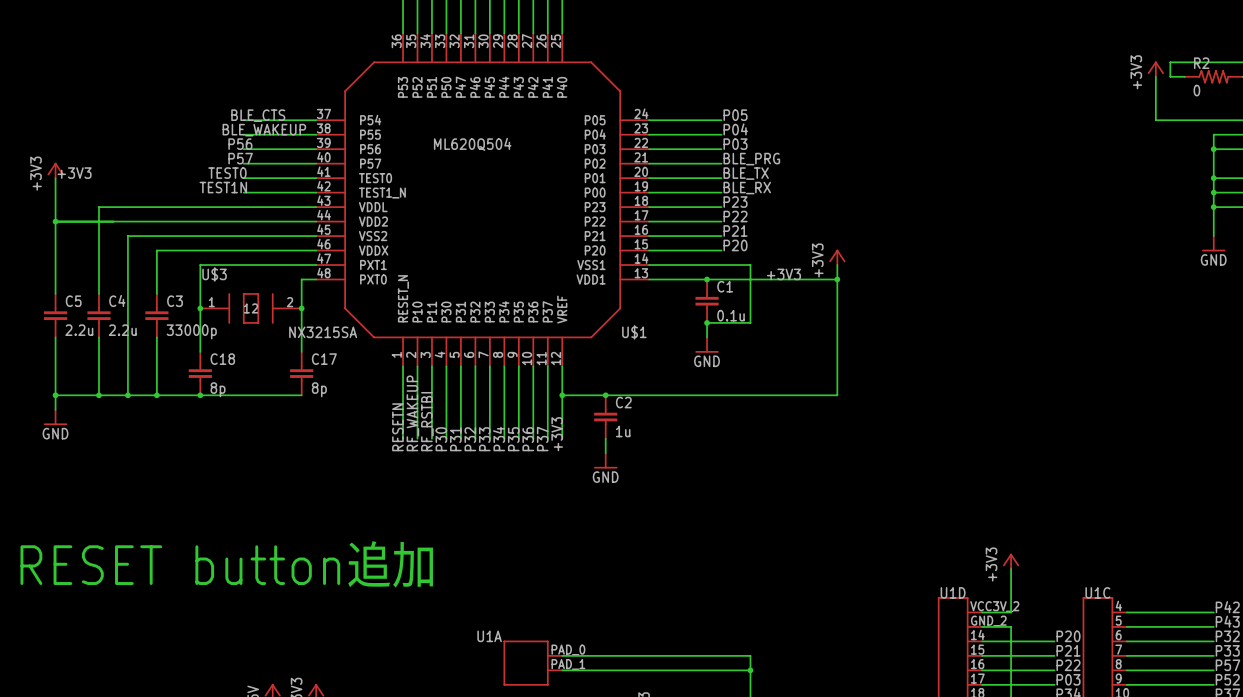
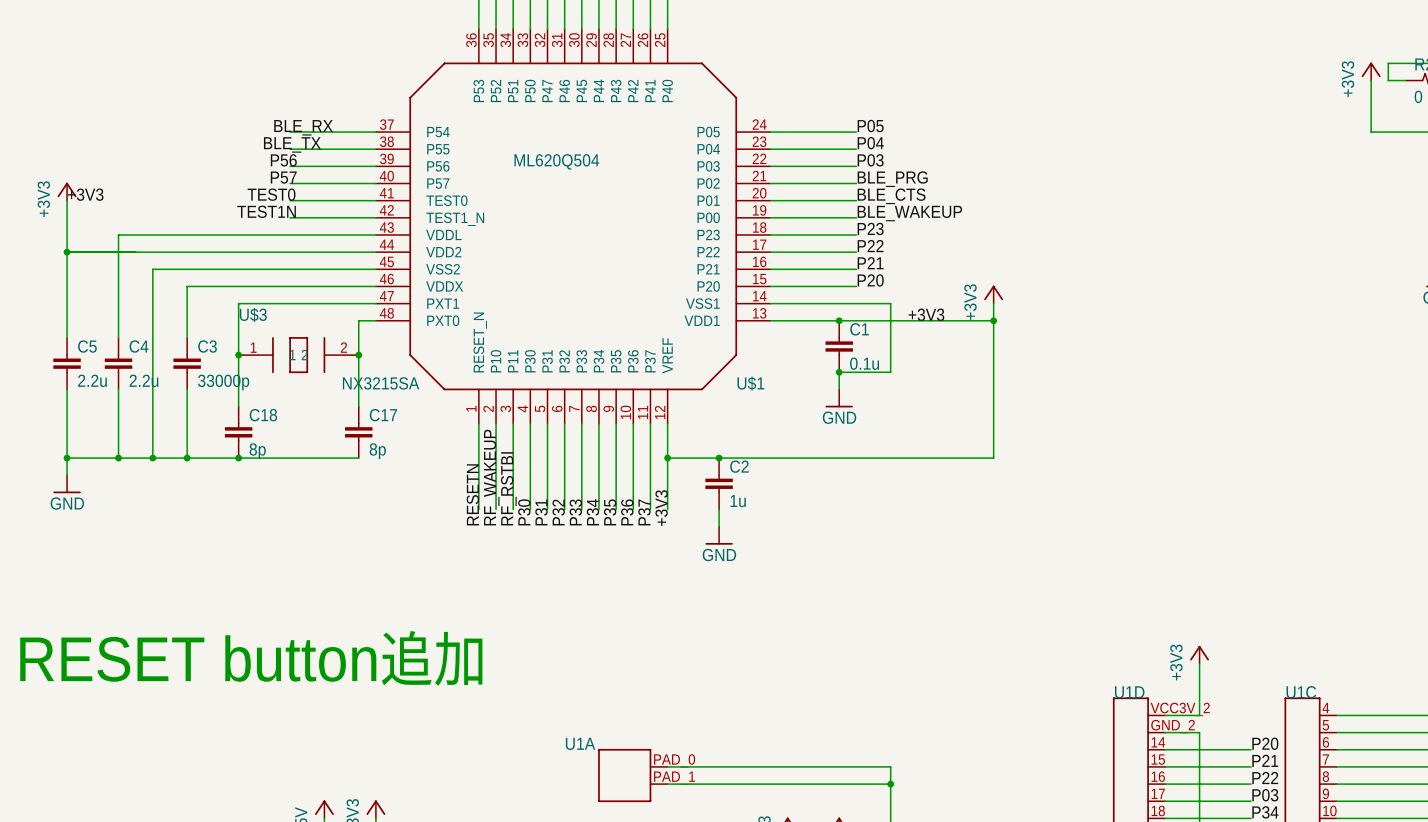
label: BLE_CTS (258, 115) -> BLE_RX (303, 127)
label: BLE_WAKEUP (264, 130) -> BLE_TX (292, 144)
label: BLE_TX (746, 173) -> BLE_CTS (891, 196)
label: BLE_RX (747, 188) -> BLE_WAKEUP (909, 213)

